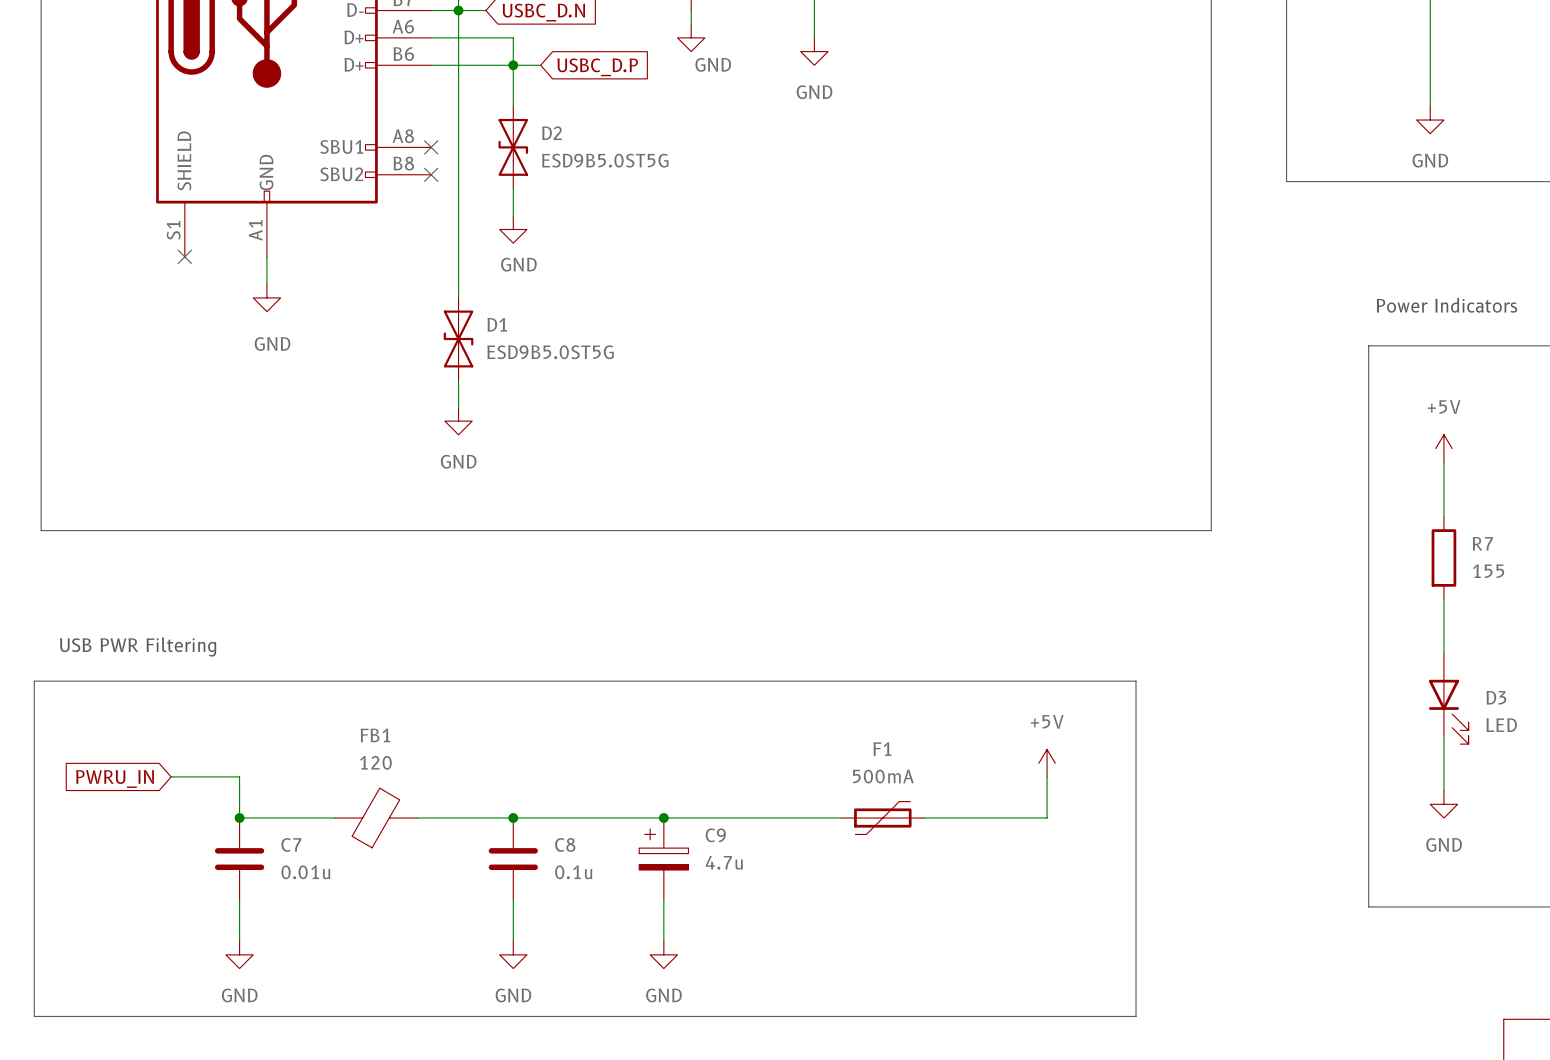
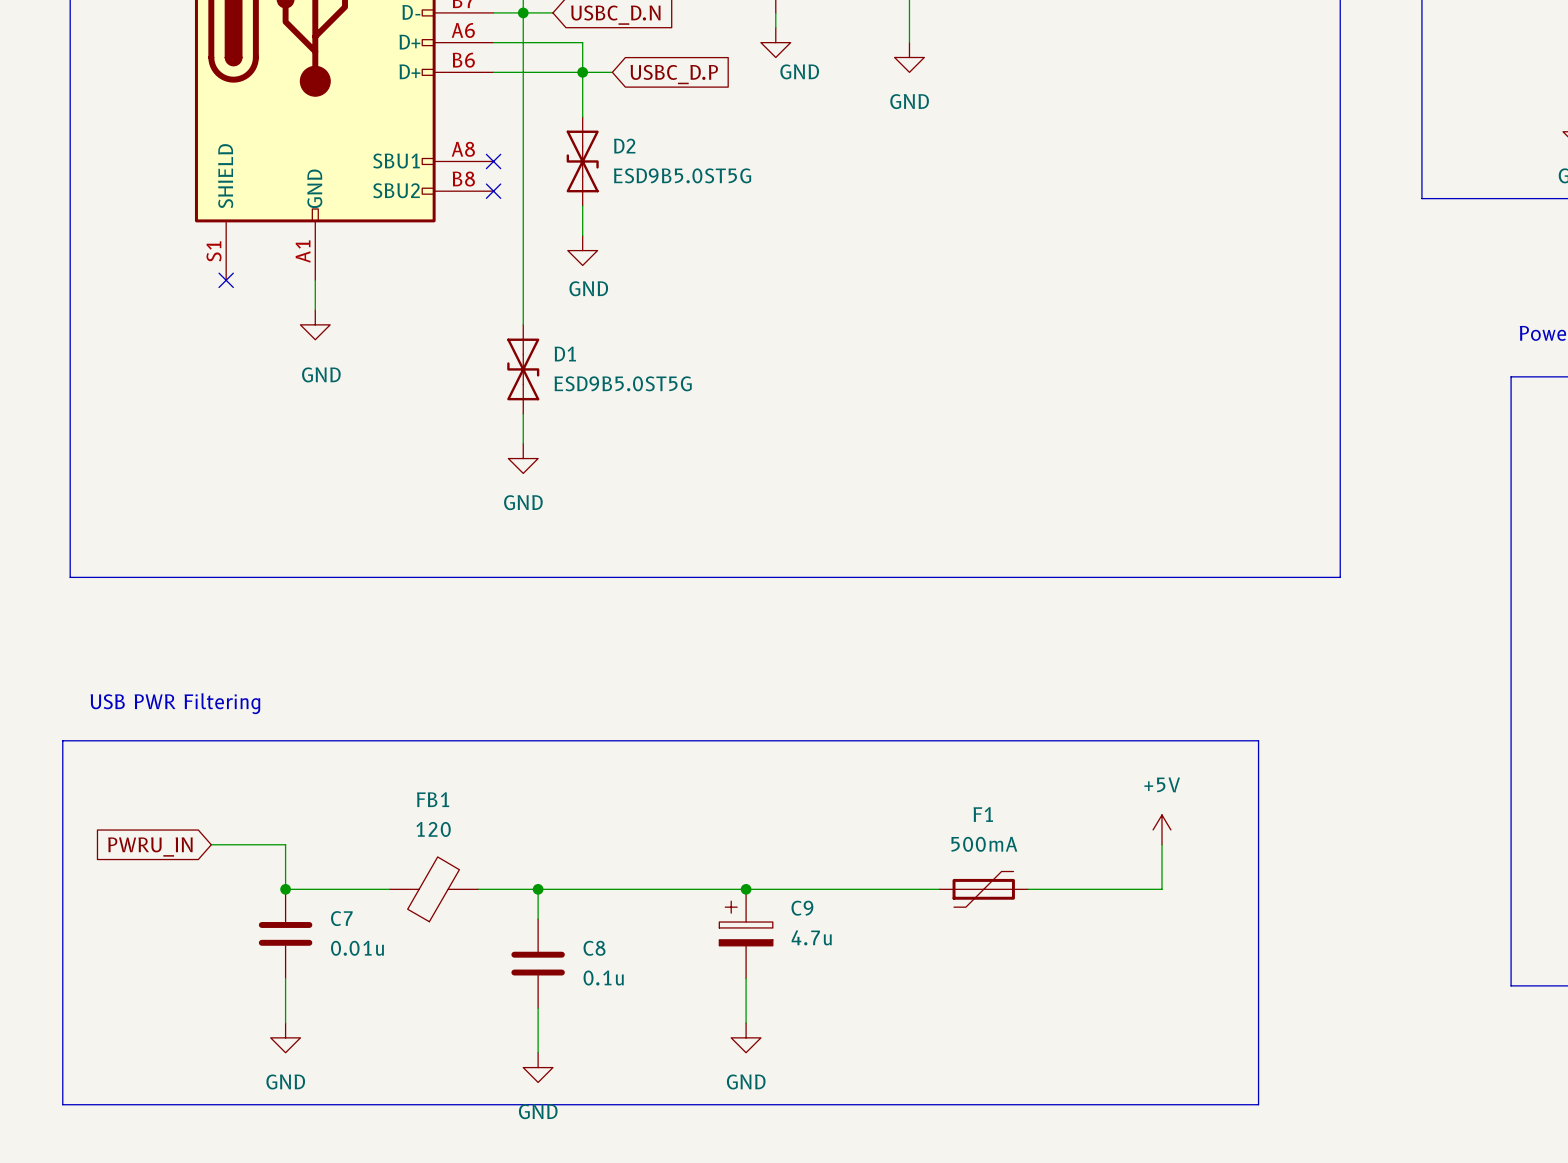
wire: none -> (538, 889) (538, 919)
junction position: (513, 818) -> (538, 889)
C8 position: (513, 859) -> (538, 963)
wire: (513, 900) (513, 941) -> (538, 1008) (538, 1052)
power symbol position: GND (513, 954) -> GND (538, 1067)

